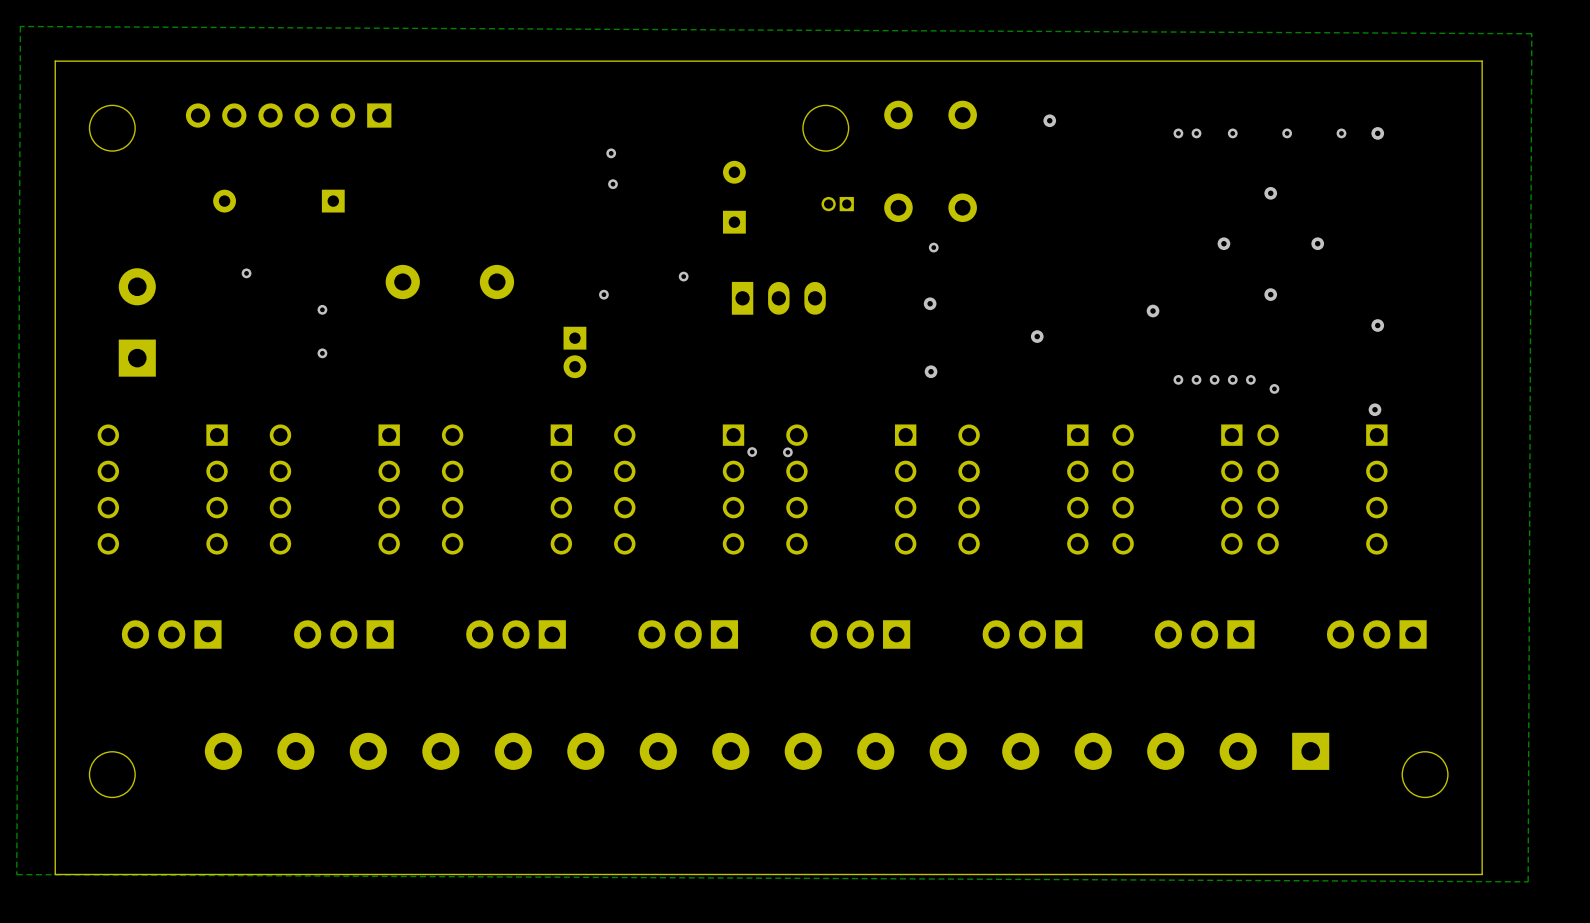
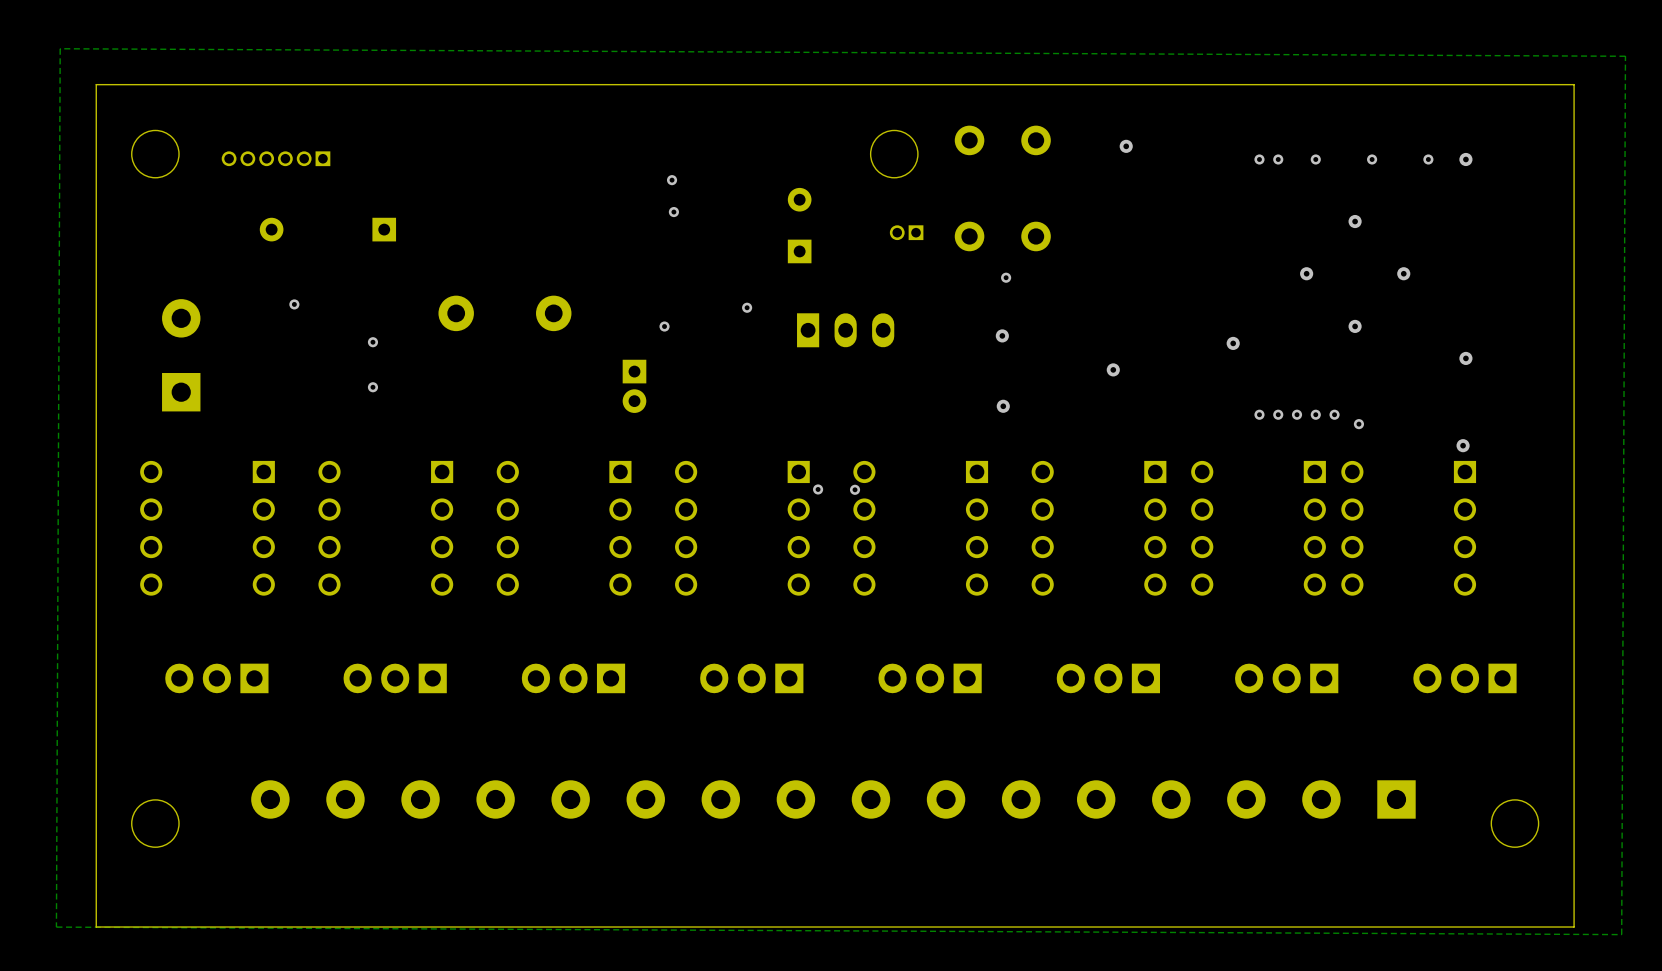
part: (288, 115) -> none
part: none -> (276, 158)

